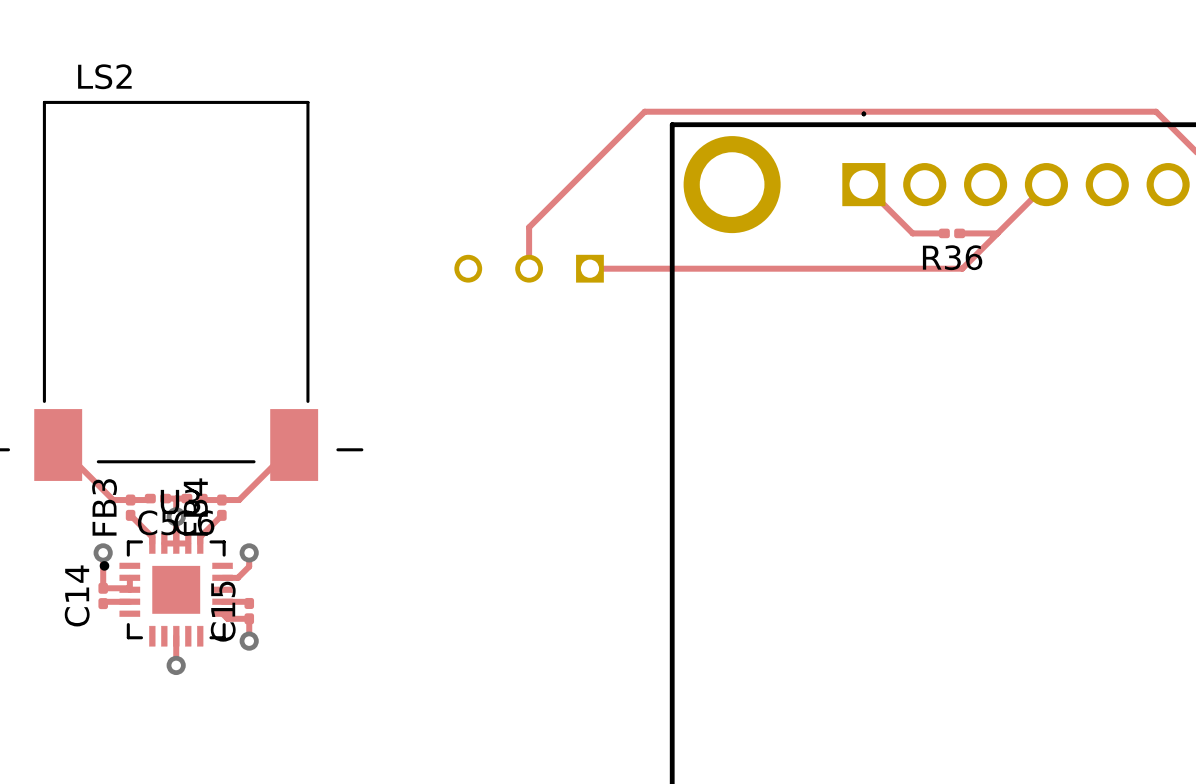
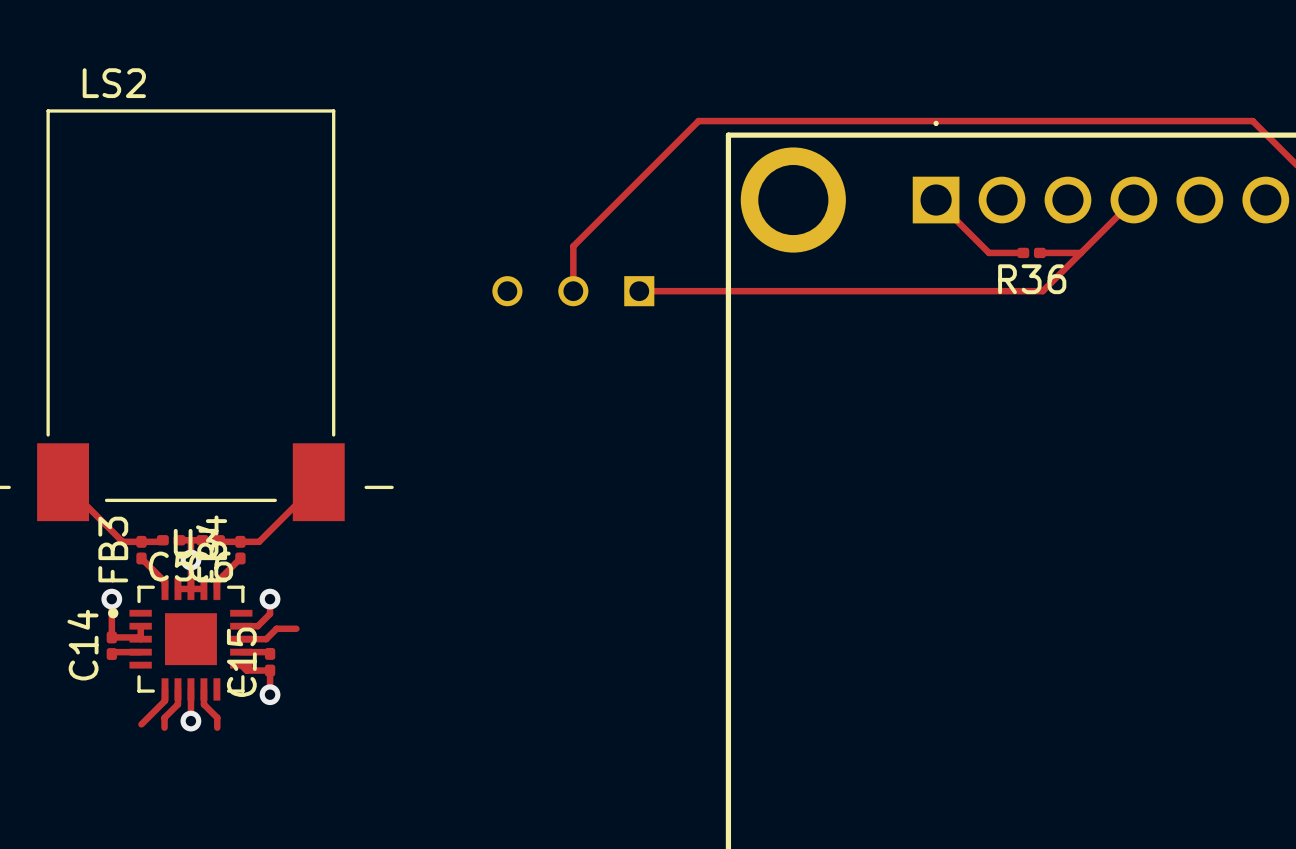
track: none -> (296, 628) (276, 628) (266, 639) (241, 639)
track: none -> (165, 689) (165, 700) (141, 724)
track: none -> (177, 689) (177, 704) (164, 717) (164, 727)
track: none -> (203, 689) (203, 704) (217, 717) (217, 727)

